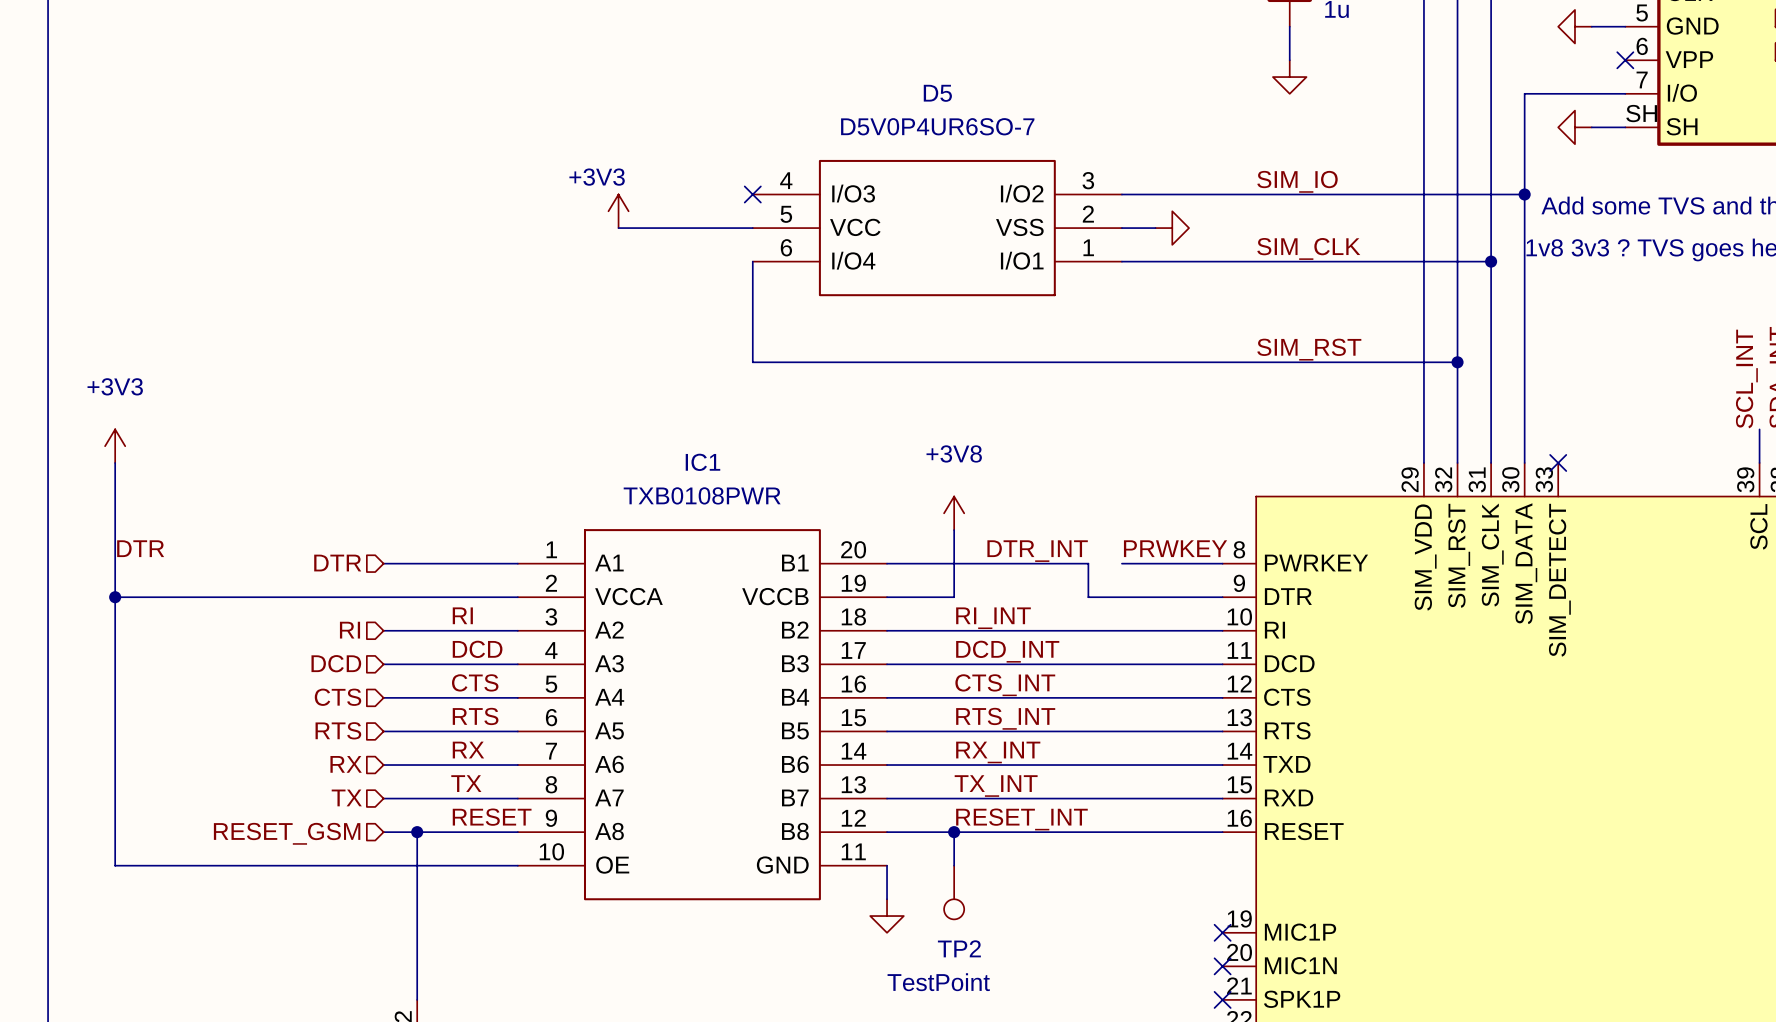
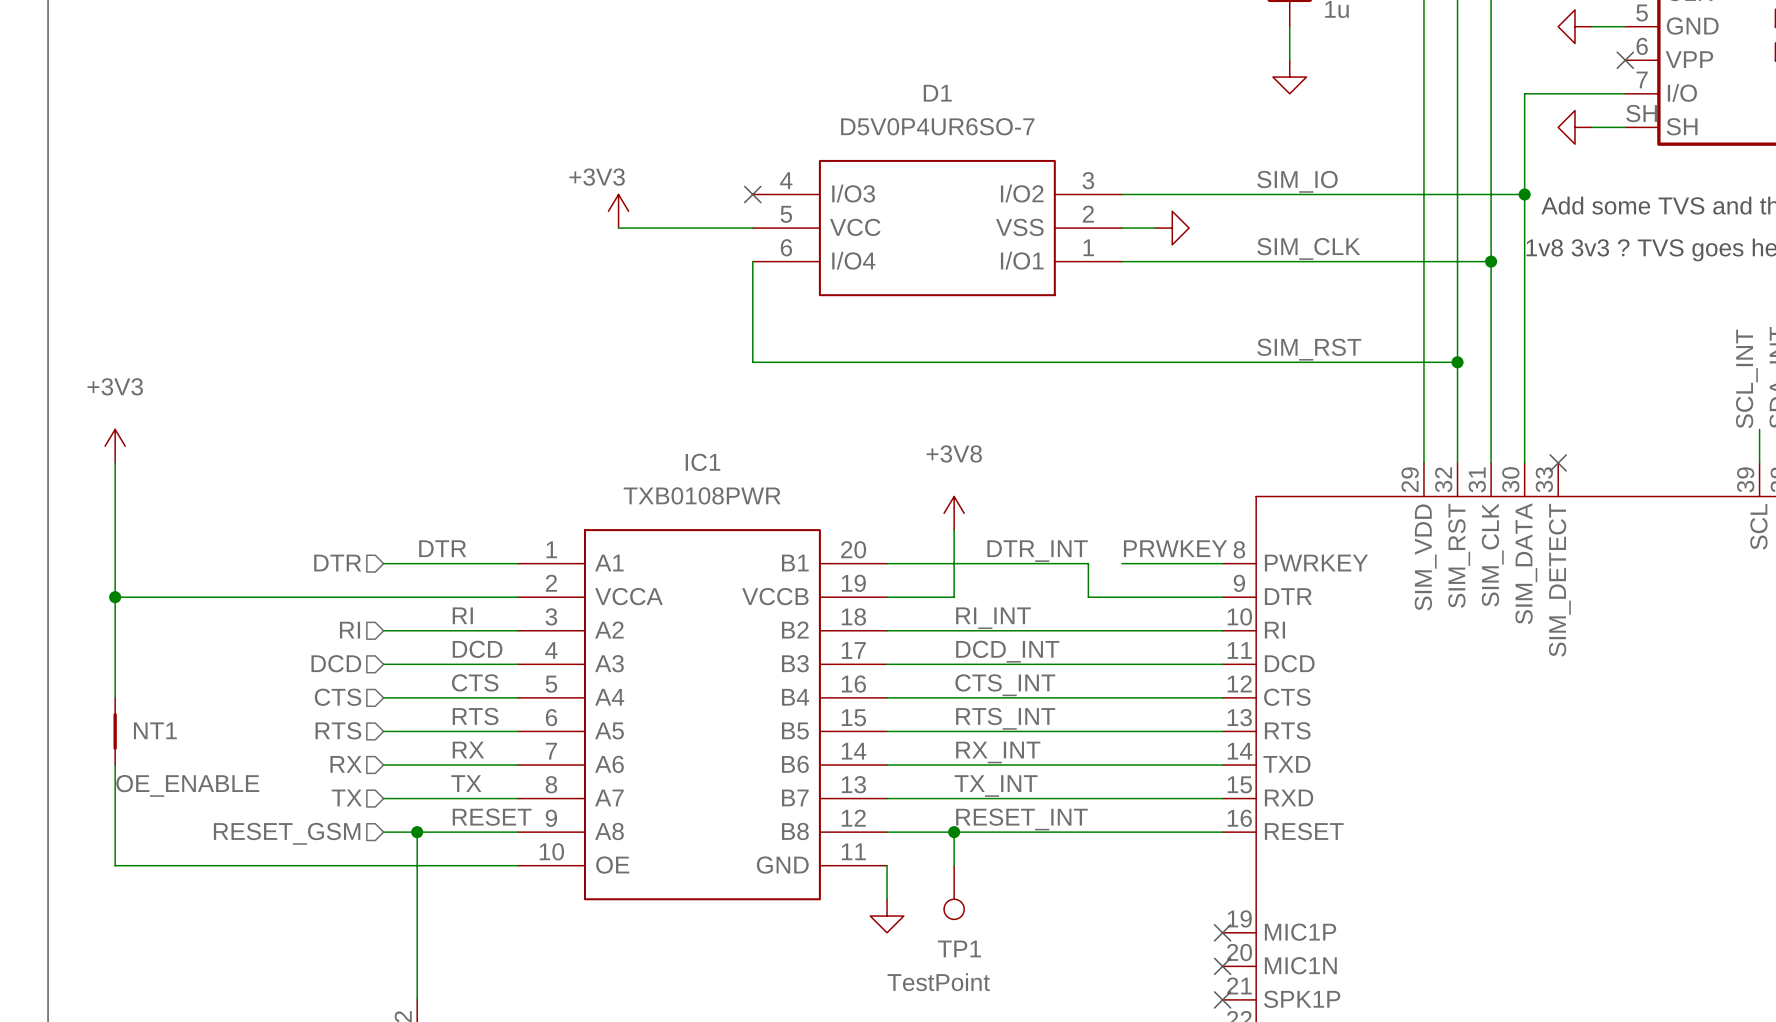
D5 name: D5 (937, 93) -> D1 (937, 93)
label position: DTR (140, 548) -> DTR (442, 548)
NT1: none -> (115, 731)
label: none -> OE_ENABLE (187, 785)
TP2 name: TP2 (959, 948) -> TP1 (959, 948)

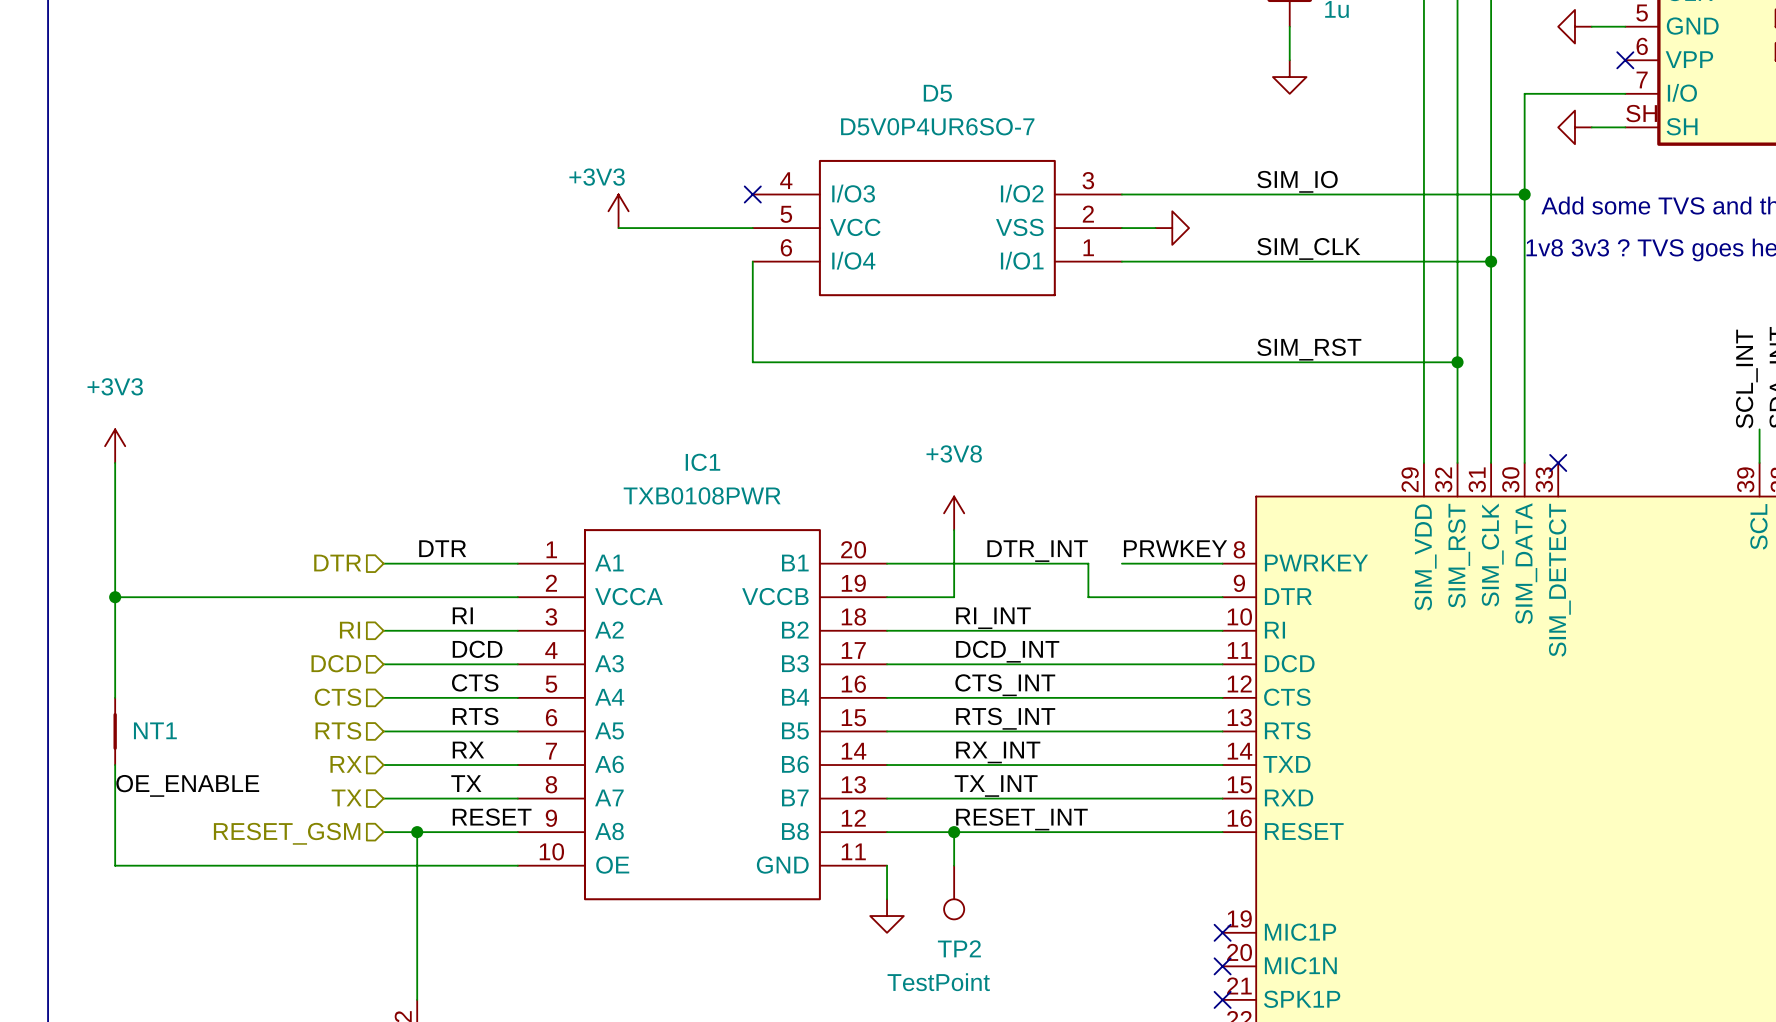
D1 name: D1 (937, 93) -> D5 (937, 93)
TP1 name: TP1 (959, 948) -> TP2 (959, 948)

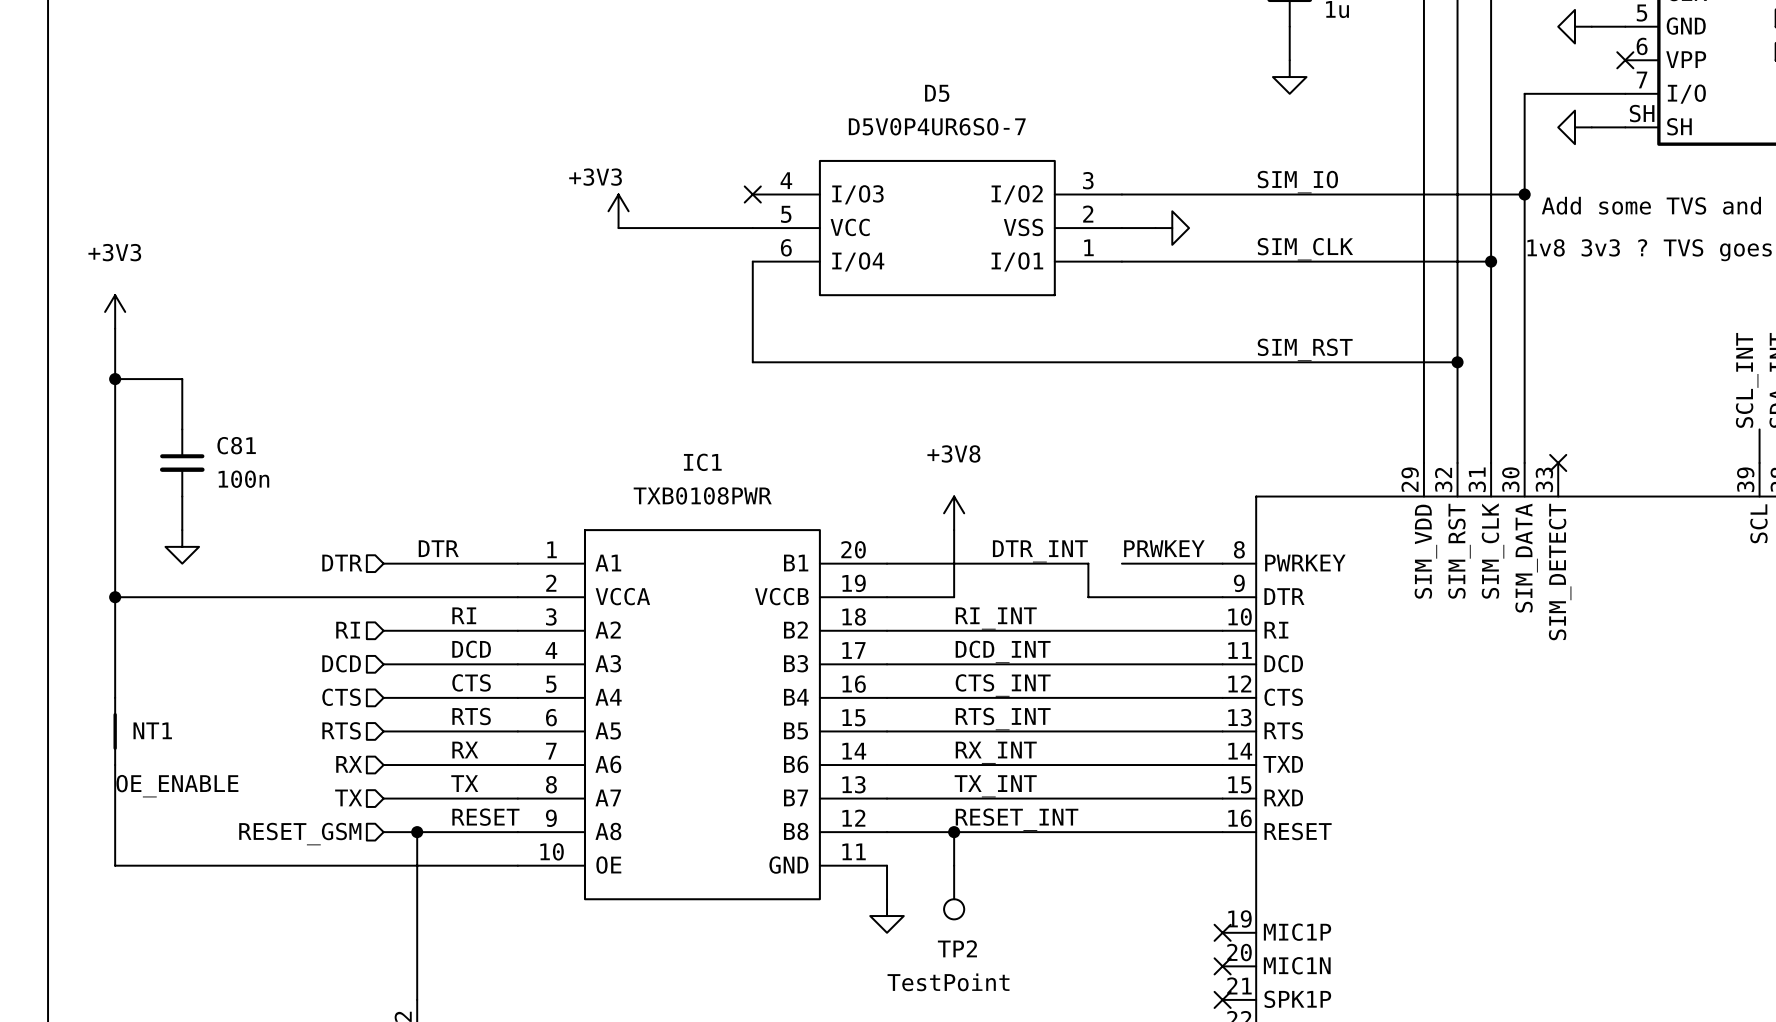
wire: none -> (115, 328) (115, 462)
wire: none -> (115, 379) (182, 379) (182, 429)
junction: none -> (115, 379)
power symbol position: +3V3 (115, 446) -> +3V3 (115, 311)
C81: none -> 100n (182, 462)
wire: none -> (182, 496) (182, 530)
power symbol: none -> (182, 546)

